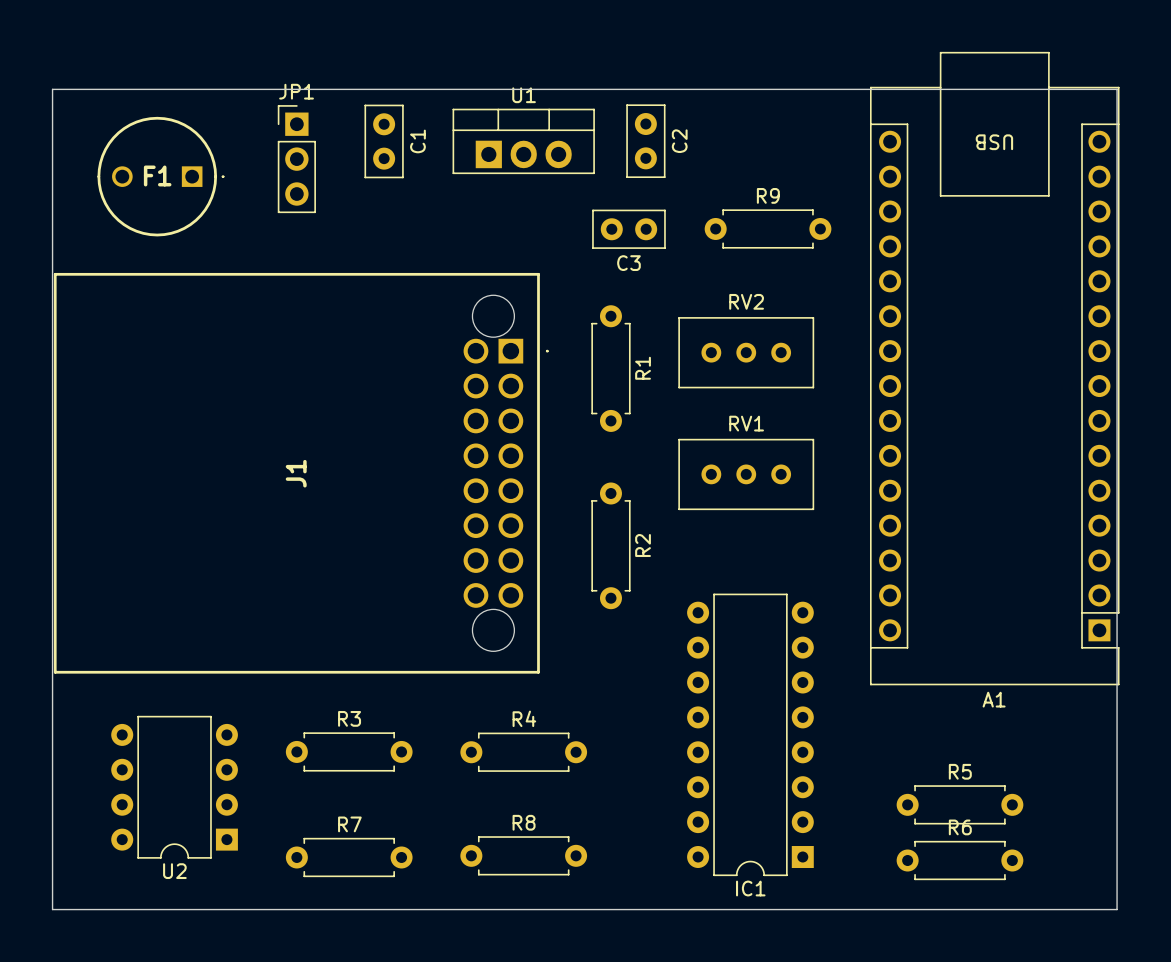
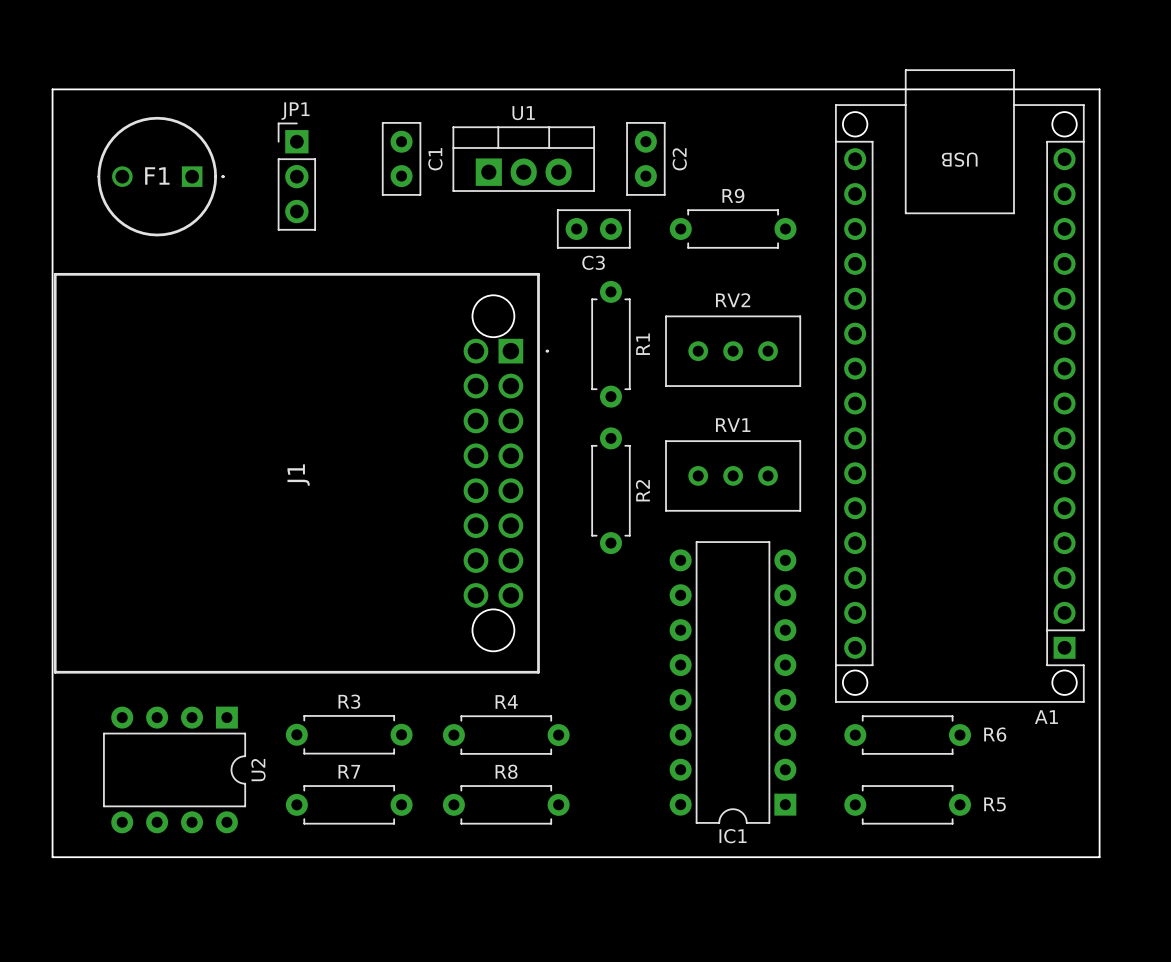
A1 footprint: [869, 51, 1120, 686] -> [835, 69, 1085, 703]
board edge: (1099, 89) (1117, 89) (1117, 909) (52, 909) (52, 857) -> (1099, 89) (1099, 857) (52, 857)
C1 position: (384, 141) -> (401, 158)
U1 position: (523, 141) -> (523, 159)
C2 position: (645, 141) -> (645, 158)
JP1 position: (296, 159) -> (296, 176)
R9 position: (768, 228) -> (733, 228)
C3 position: (628, 229) -> (593, 228)
RV2 position: (746, 352) -> (733, 351)
R1 position: (610, 368) -> (610, 344)
RV1 position: (746, 474) -> (733, 475)
R2 position: (610, 545) -> (610, 490)
A1 name position: A1 (994, 699) -> A1 (1046, 717)
IC1 position: (750, 734) -> (732, 682)
R3 position: (349, 751) -> (349, 734)
R4 position: (523, 752) -> (506, 735)
R5 name position: R5 (960, 771) -> R5 (994, 804)
U2 rotation: 0° (174, 787) -> 90° counterclockwise (174, 769)
R5 position: (959, 804) -> (907, 804)
R6 name position: R6 (960, 827) -> R6 (995, 734)
R8 position: (523, 855) -> (506, 804)
R7 position: (349, 857) -> (349, 804)
R6 position: (959, 860) -> (907, 735)

